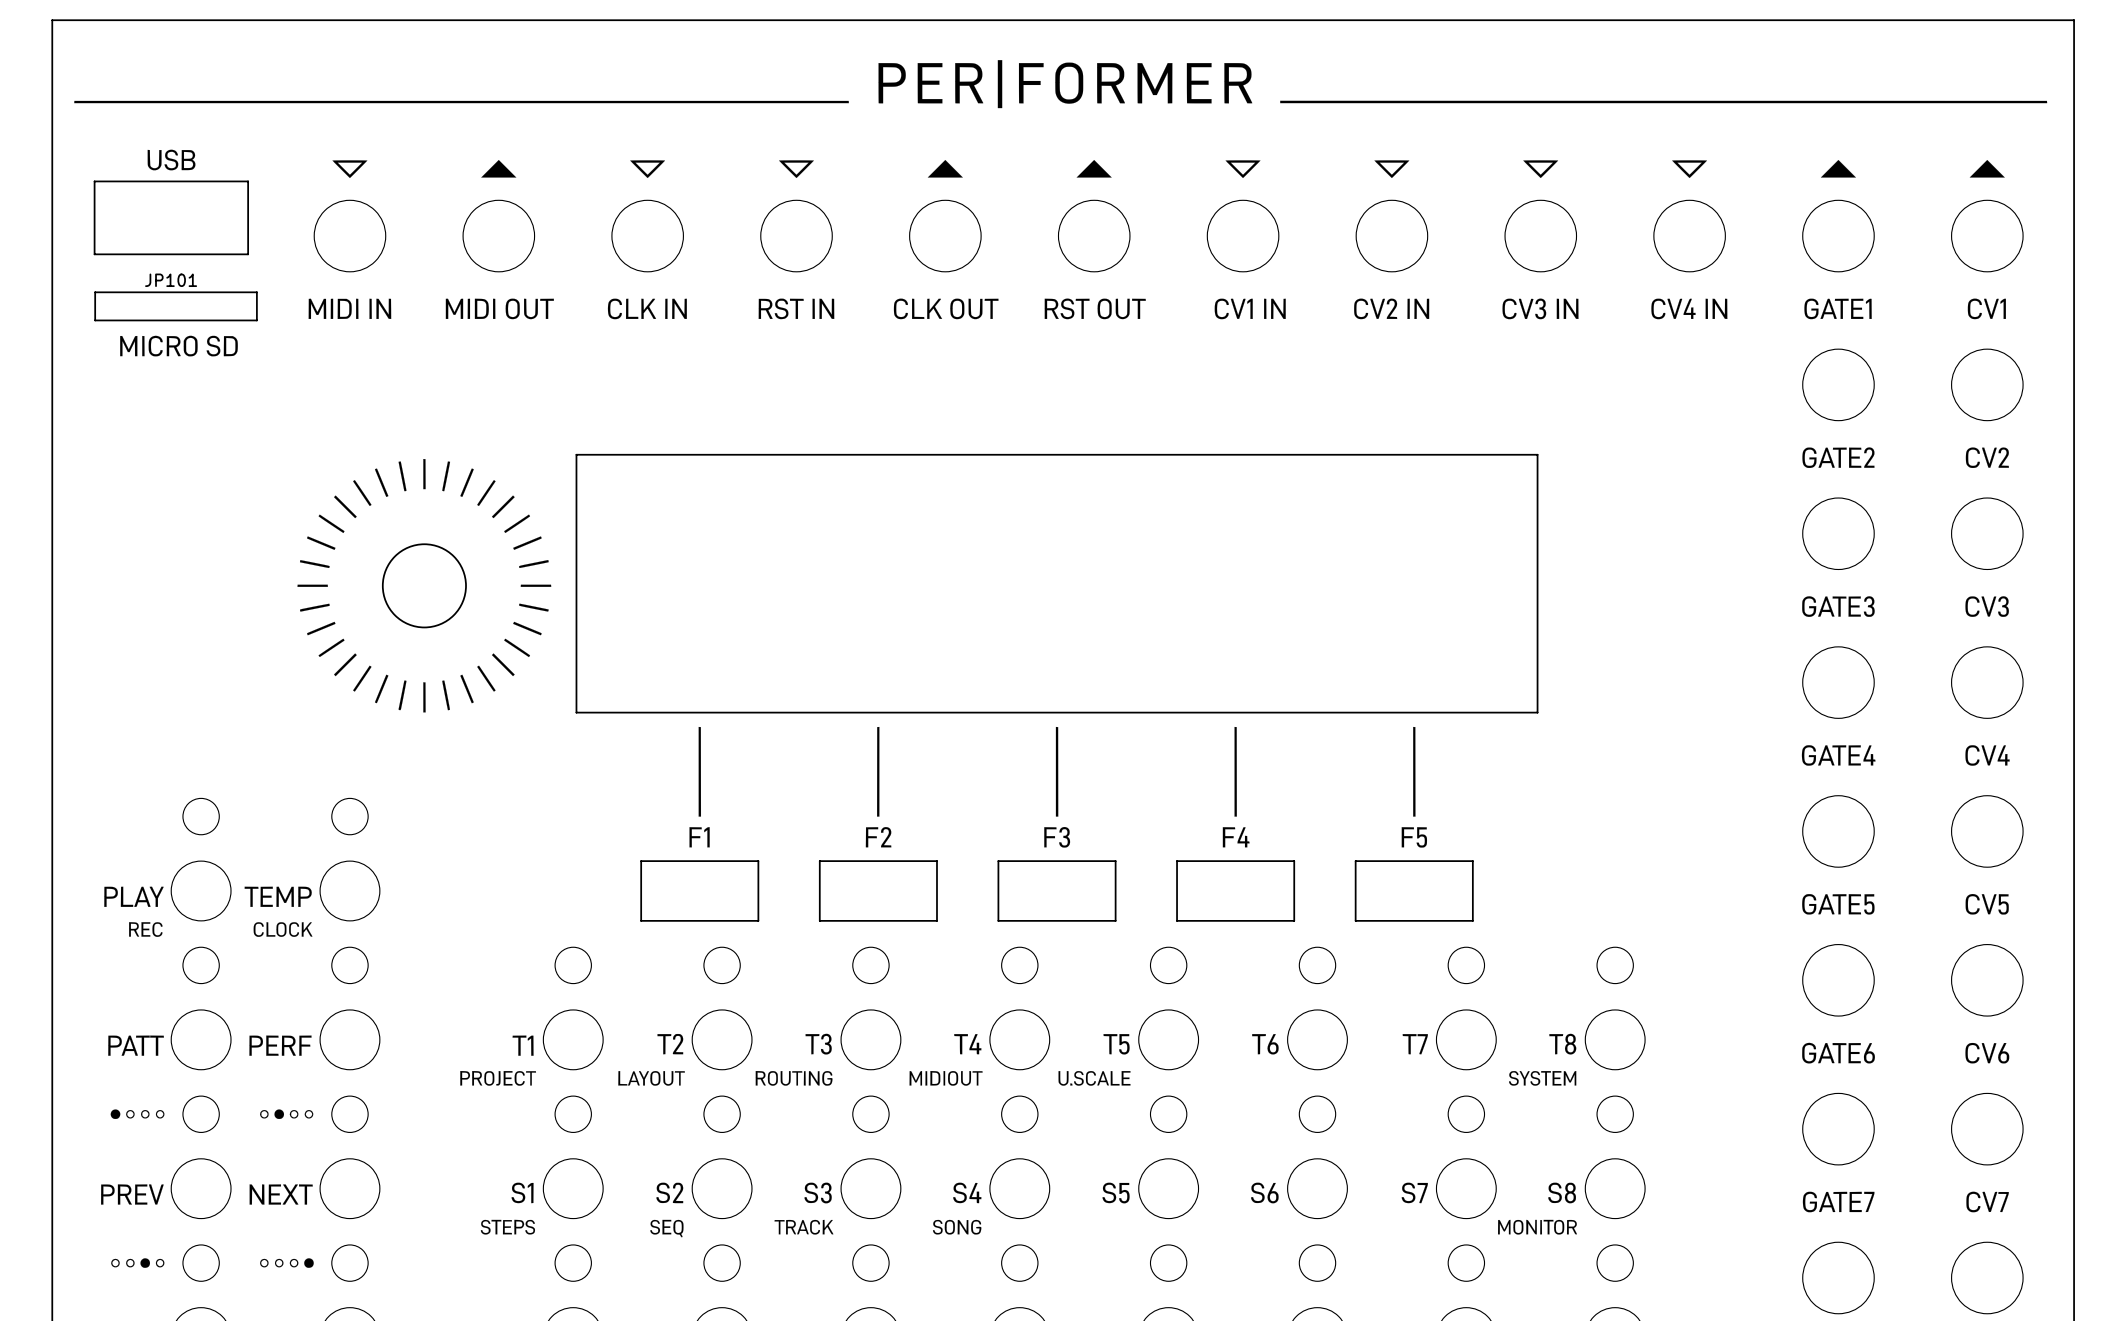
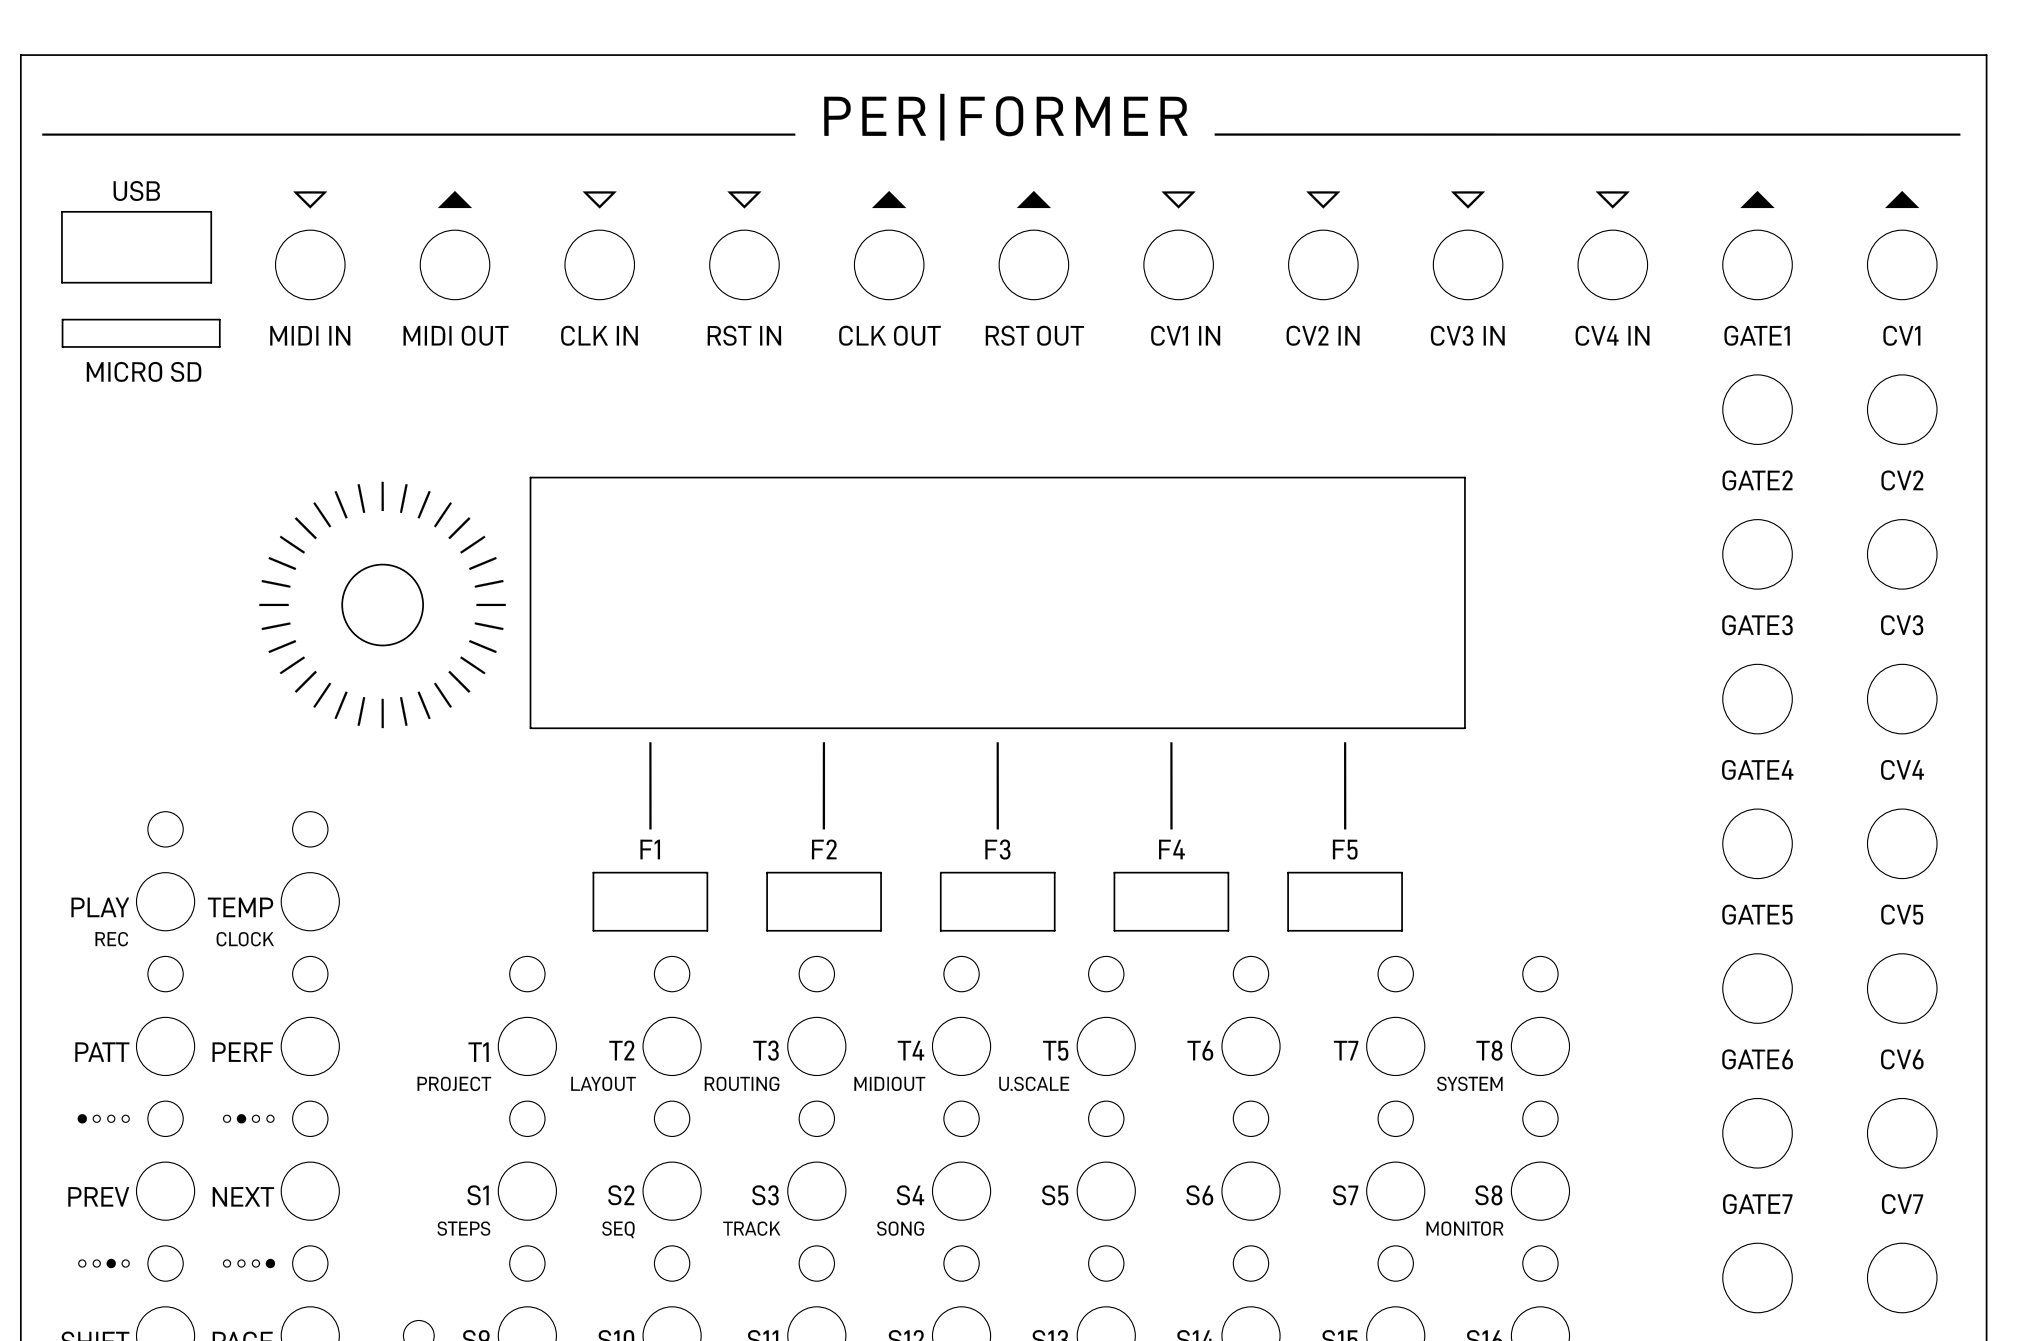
JP101: (171, 217) -> none

